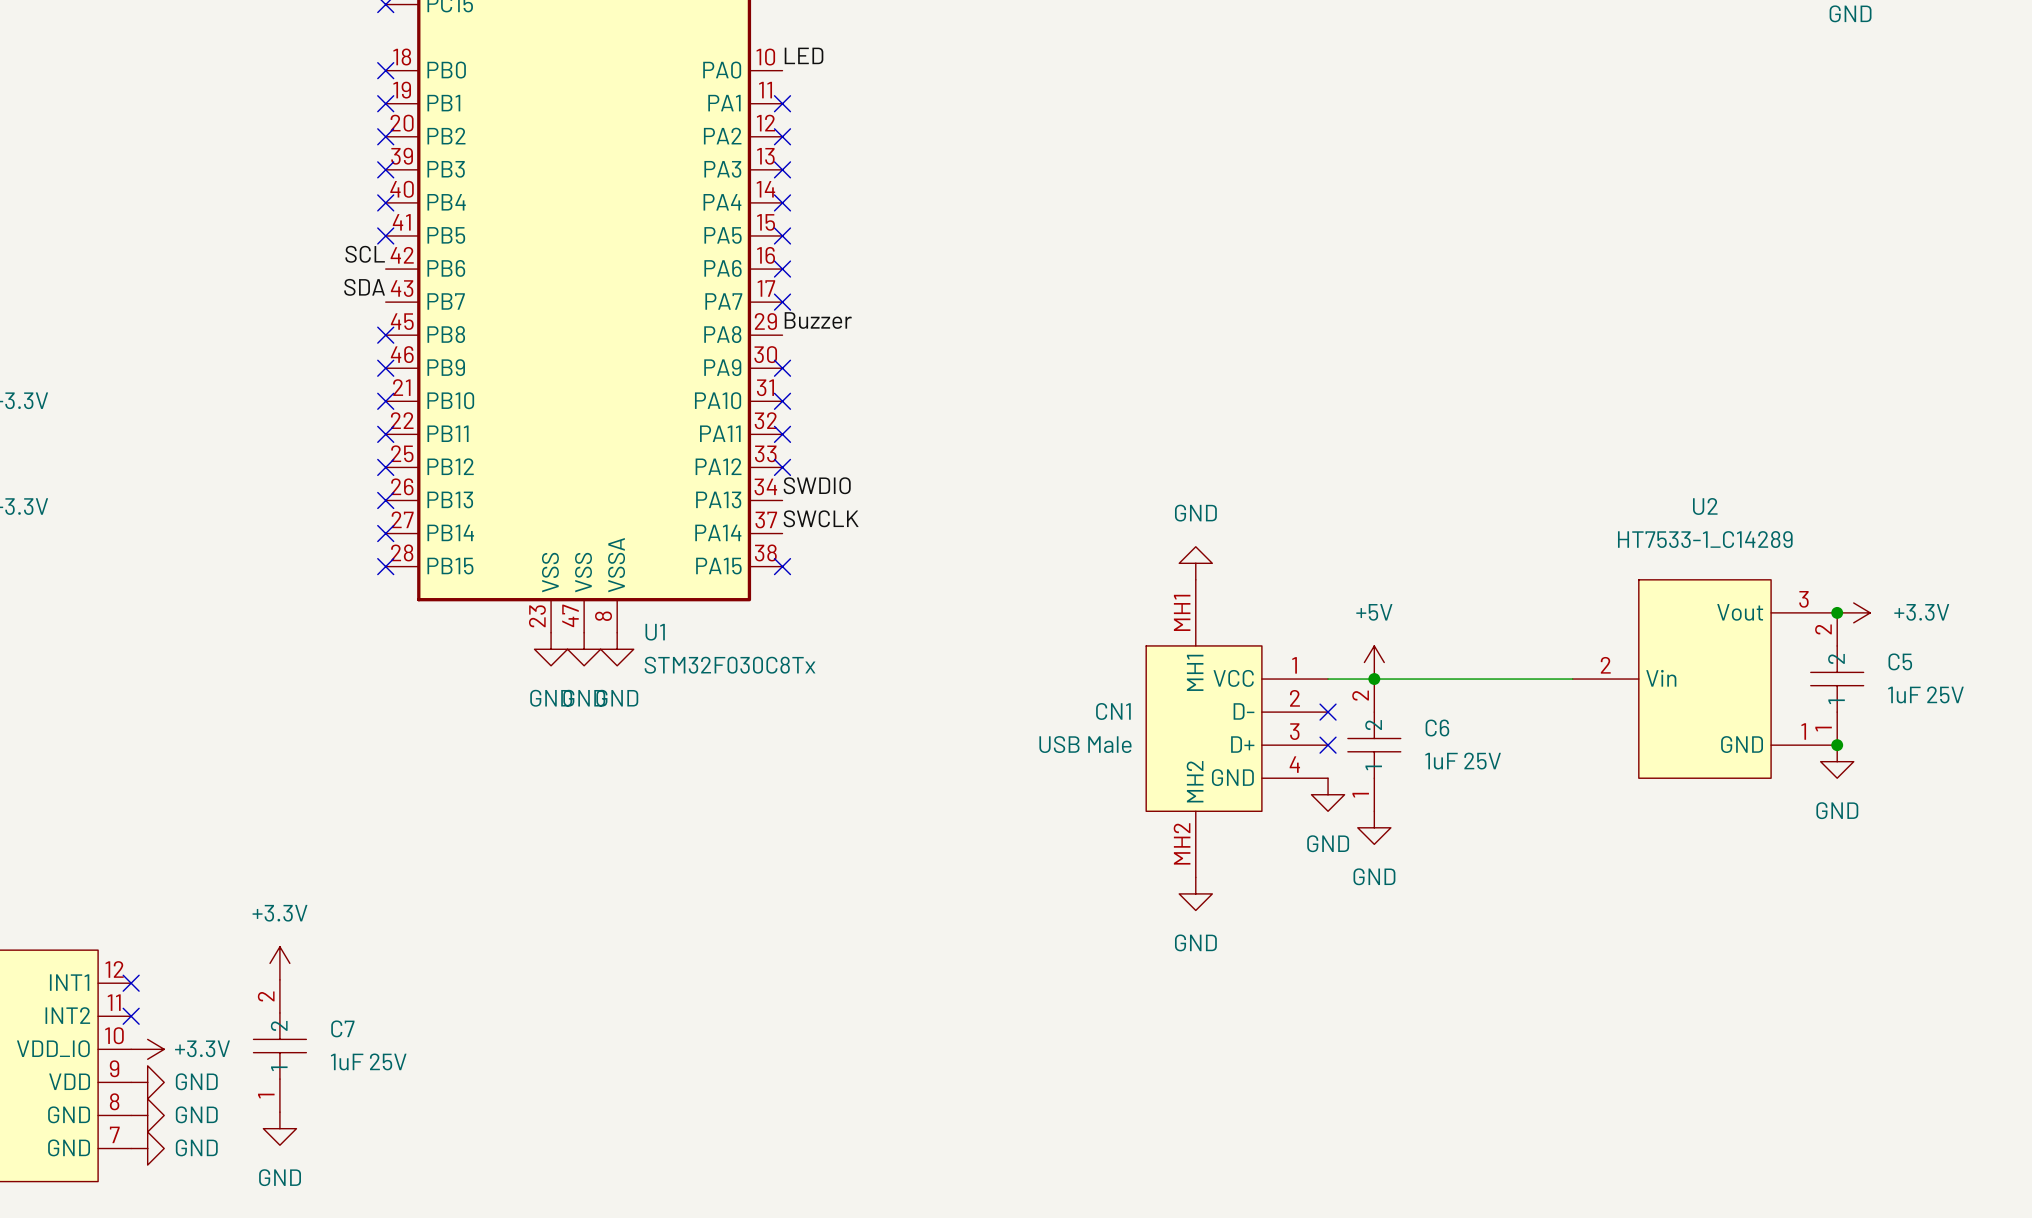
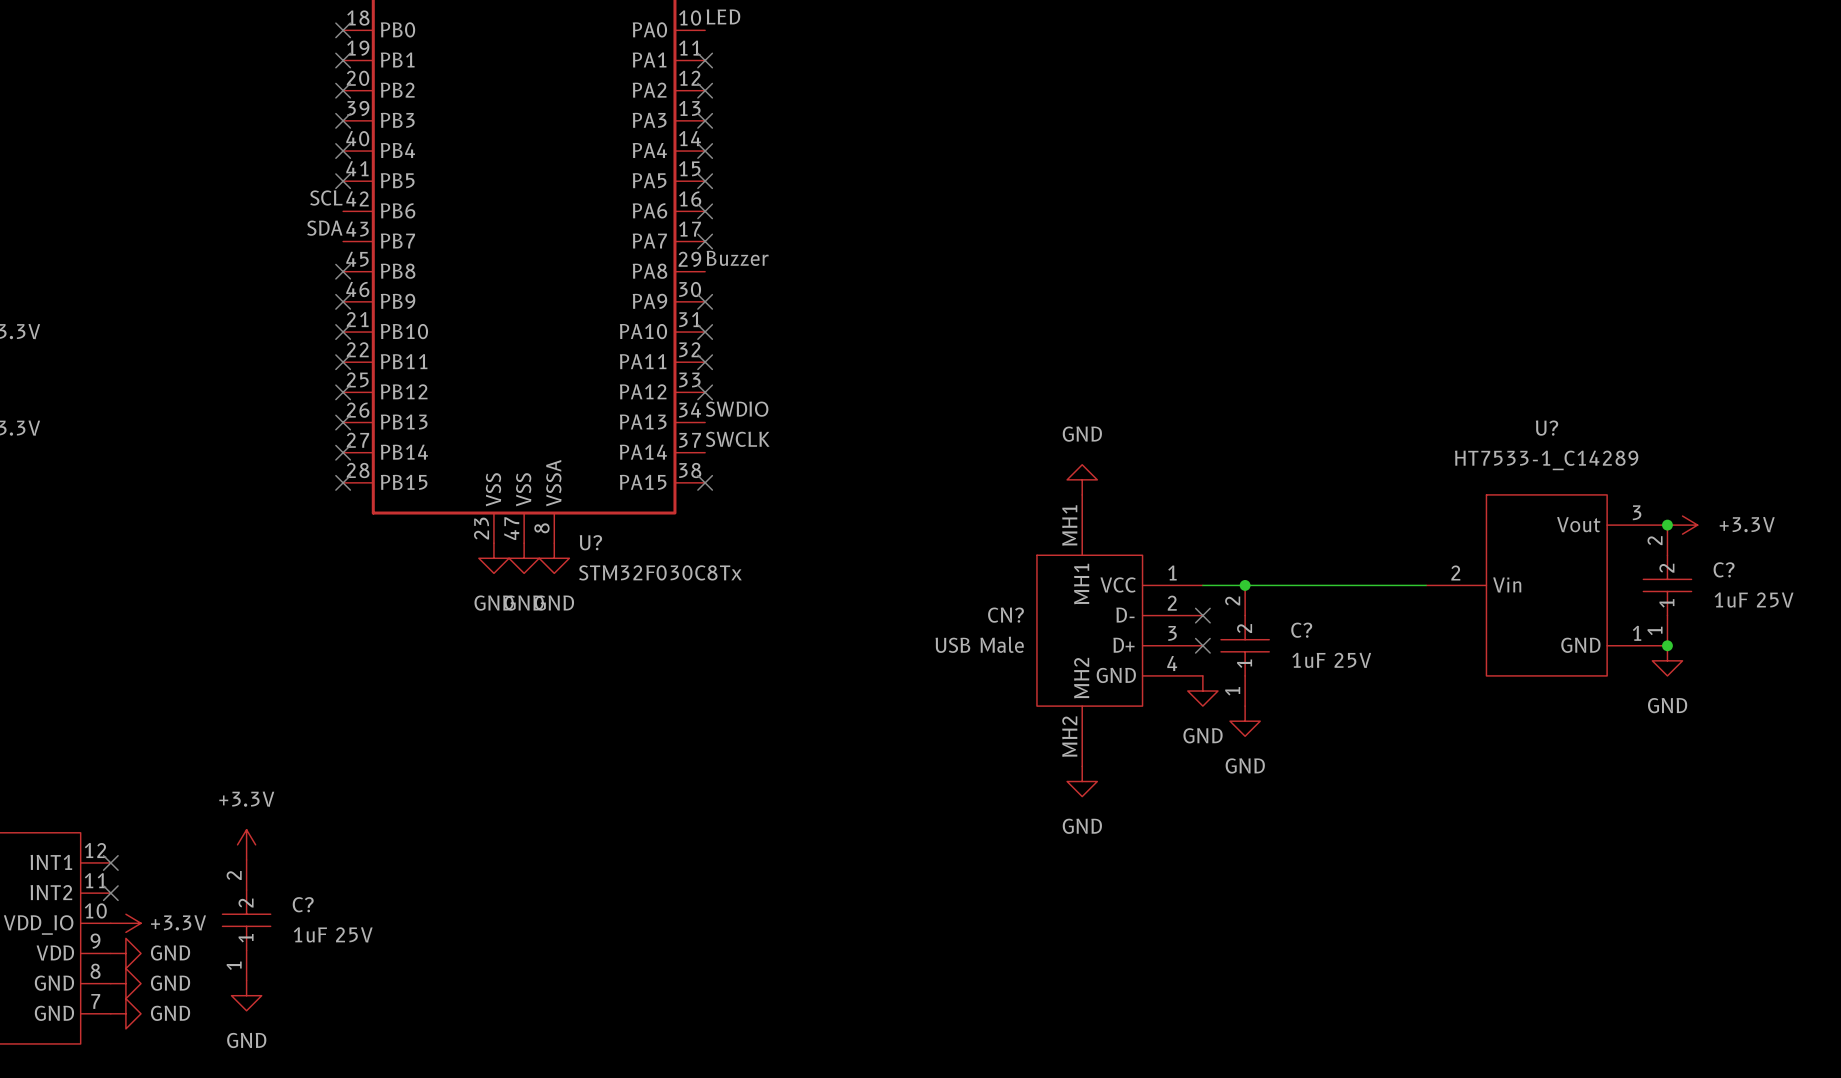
U2 name: U2 (1705, 506) -> U? (1547, 428)
U1 name: U1 (655, 632) -> U? (590, 542)
C5 name: C5 (1900, 661) -> C? (1724, 569)
power symbol: +5V (1374, 662) -> none
CN1 name: CN1 (1113, 711) -> CN? (1005, 615)
C6 name: C6 (1437, 728) -> C? (1301, 630)
C7 name: C7 (342, 1028) -> C? (303, 904)

